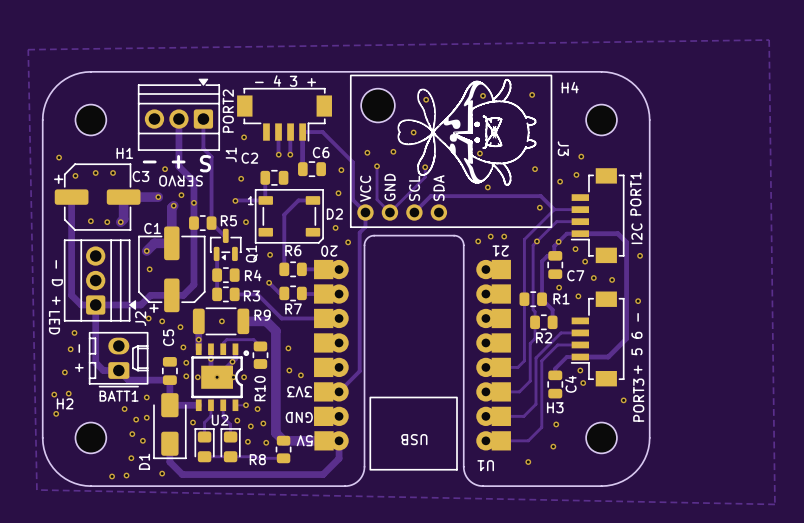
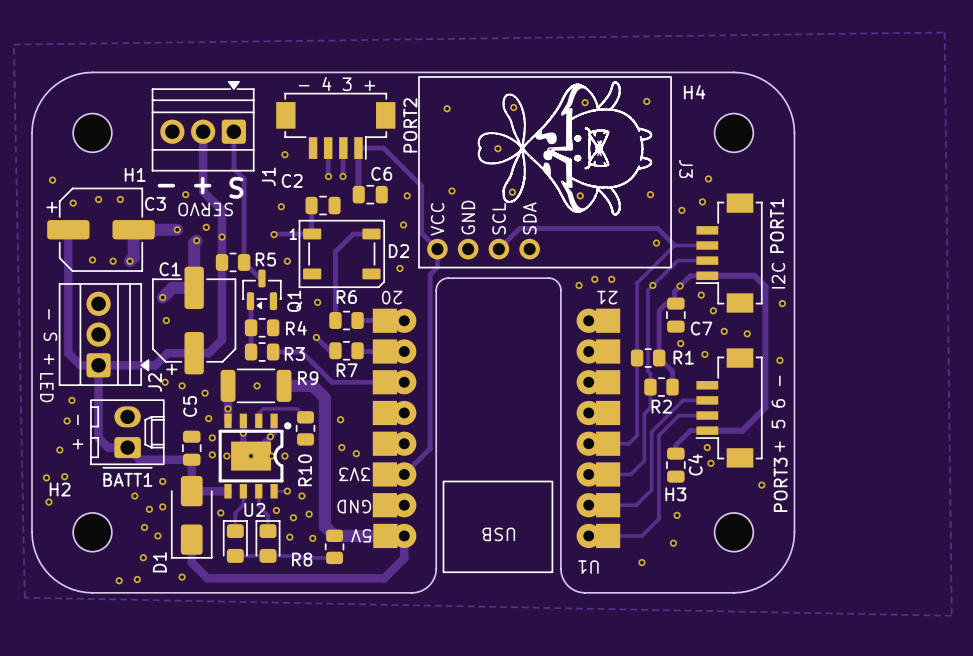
via: none -> (447, 108)
part: (377, 105) -> none
PORT2 name position: PORT2 (228, 111) -> PORT2 (410, 125)
via: (393, 151) -> none
via: (367, 152) -> none
via: (479, 153) -> none
track: (377, 166) (377, 199) (389, 212) (425, 177) (425, 167) -> none
via: none -> (580, 195)
via: (487, 187) -> none
via: (348, 242) -> none
text: - D + (57, 282) -> - S + (50, 336)

